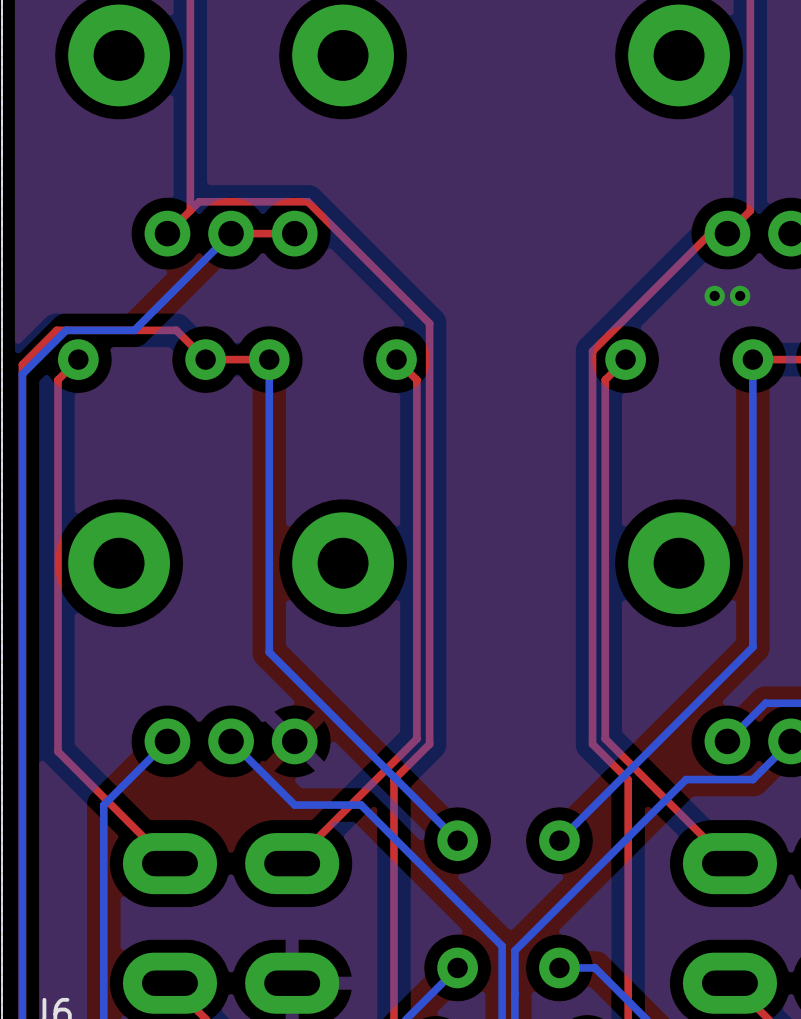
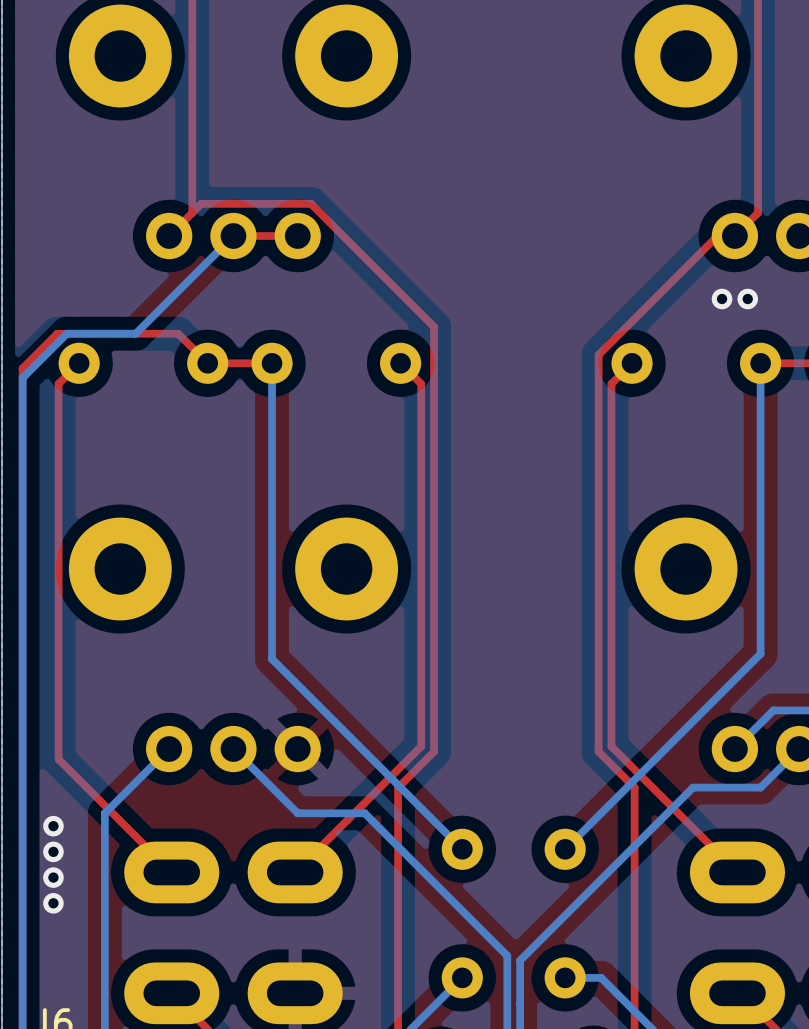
via: none -> (53, 826)
via: none -> (53, 851)
via: none -> (53, 877)
via: none -> (53, 903)

